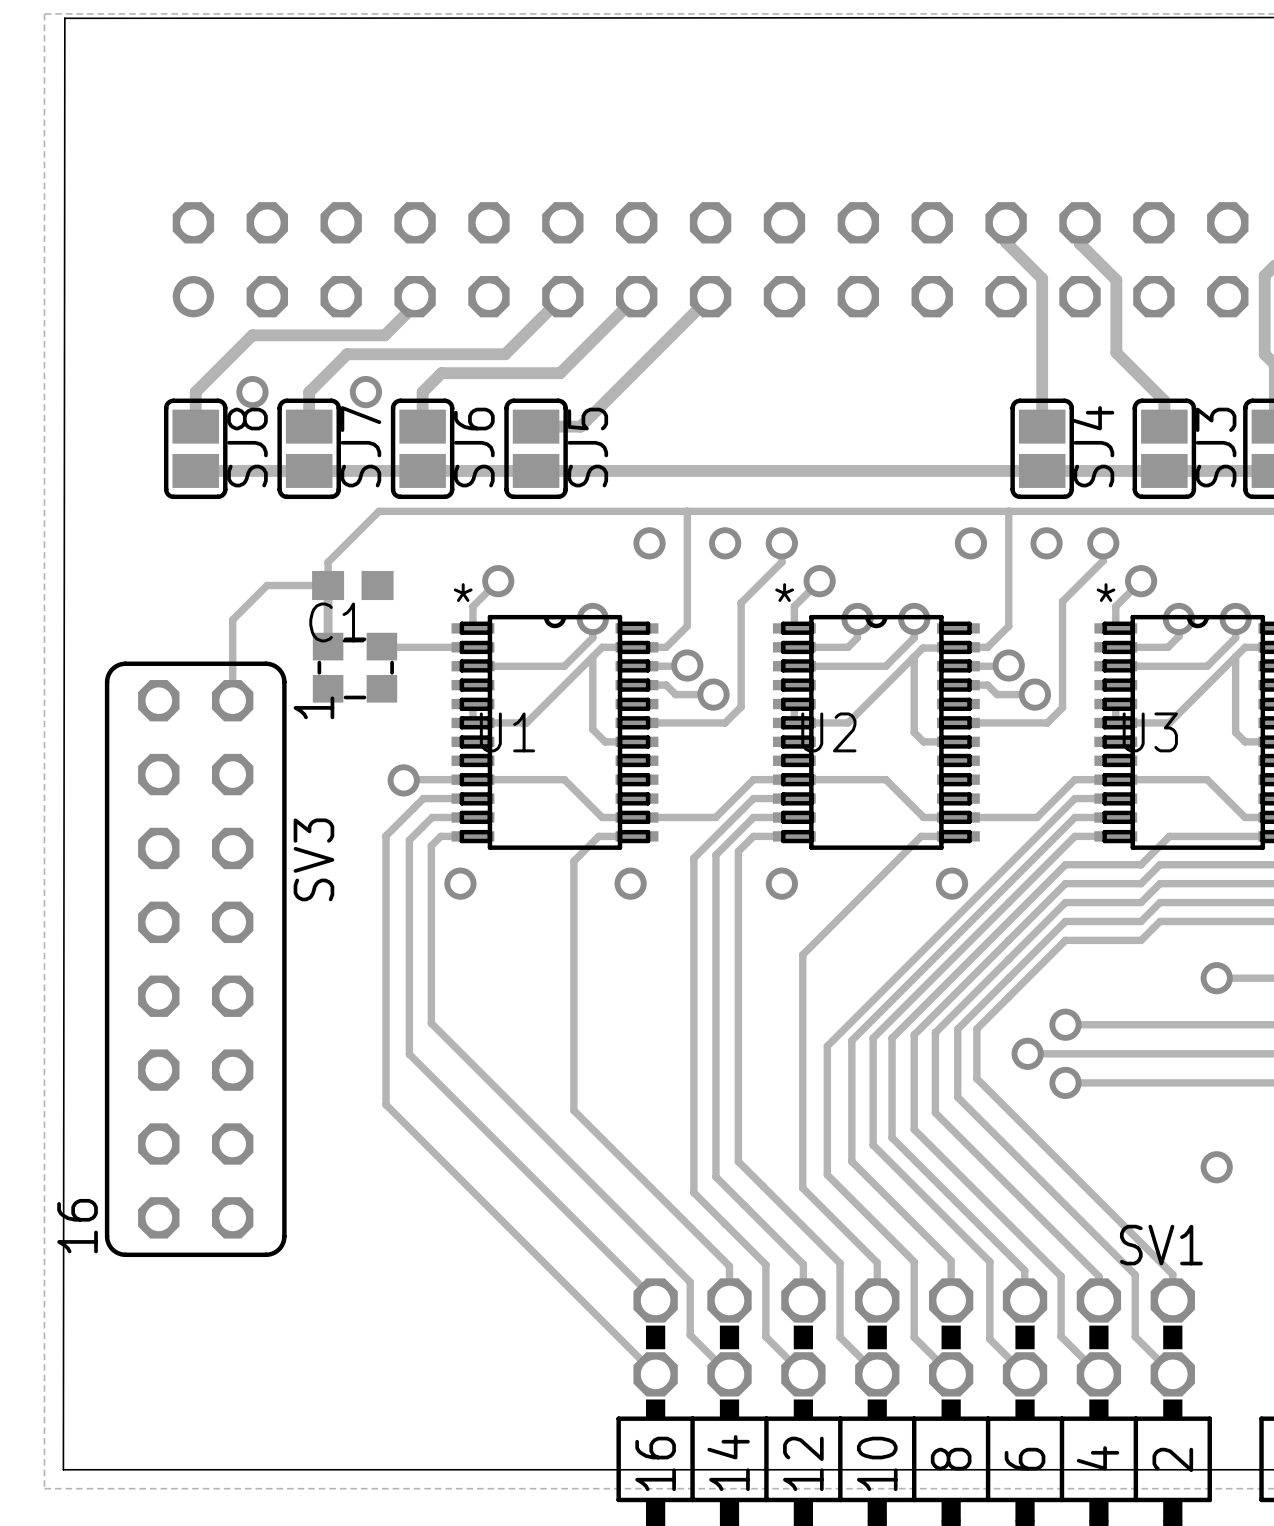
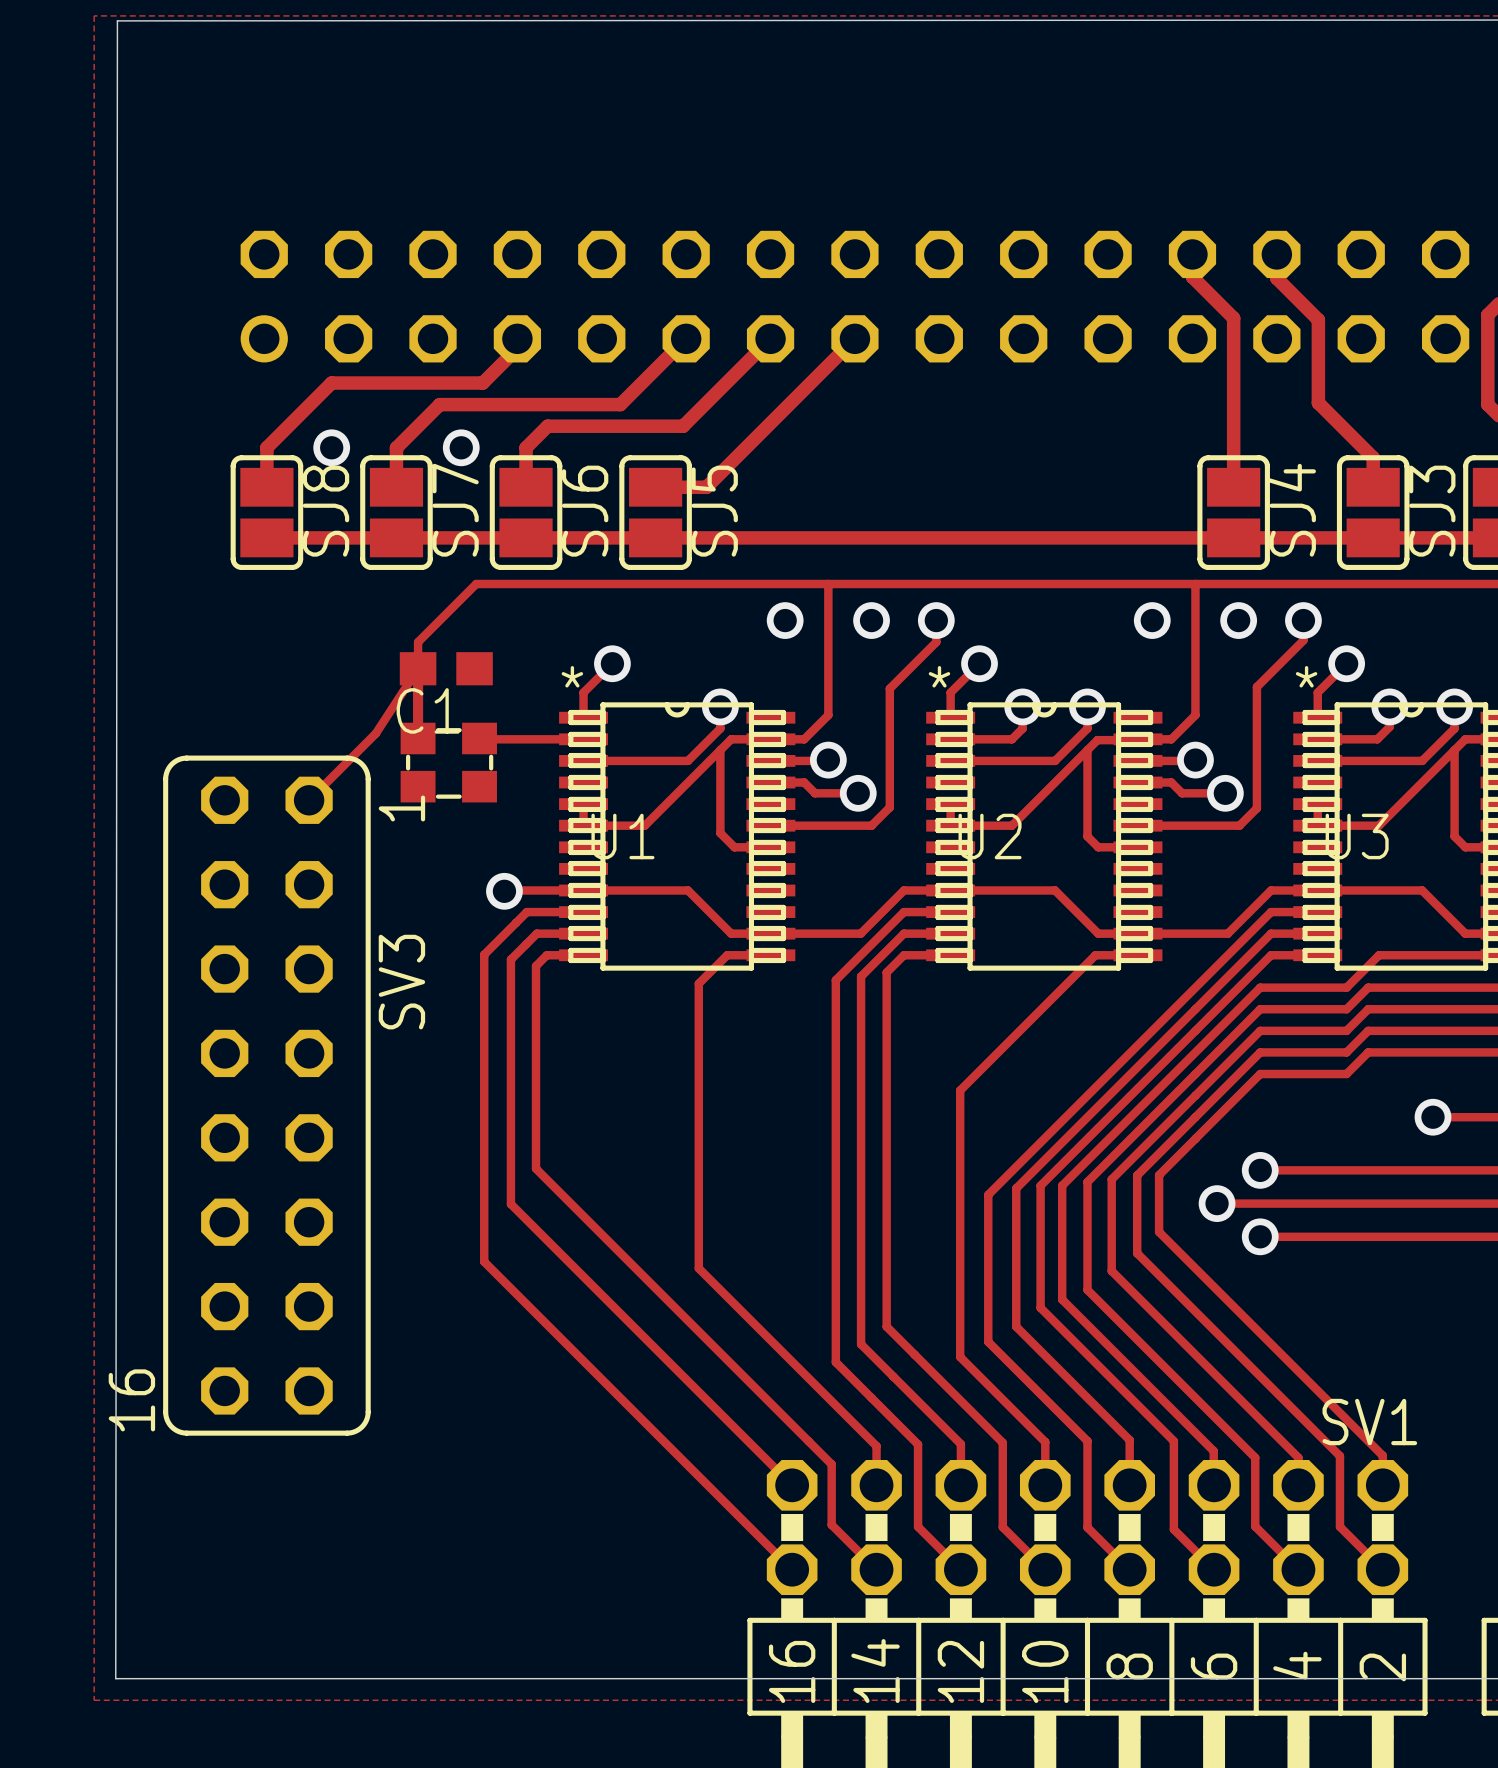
track: (328, 585) (267, 585) (232, 619) (232, 700) -> (418, 668) (375, 733) (309, 800)
via: (460, 883) -> none
via: (630, 883) -> none
via: (781, 883) -> none
via: (952, 883) -> none
via: (1216, 1167) -> none

